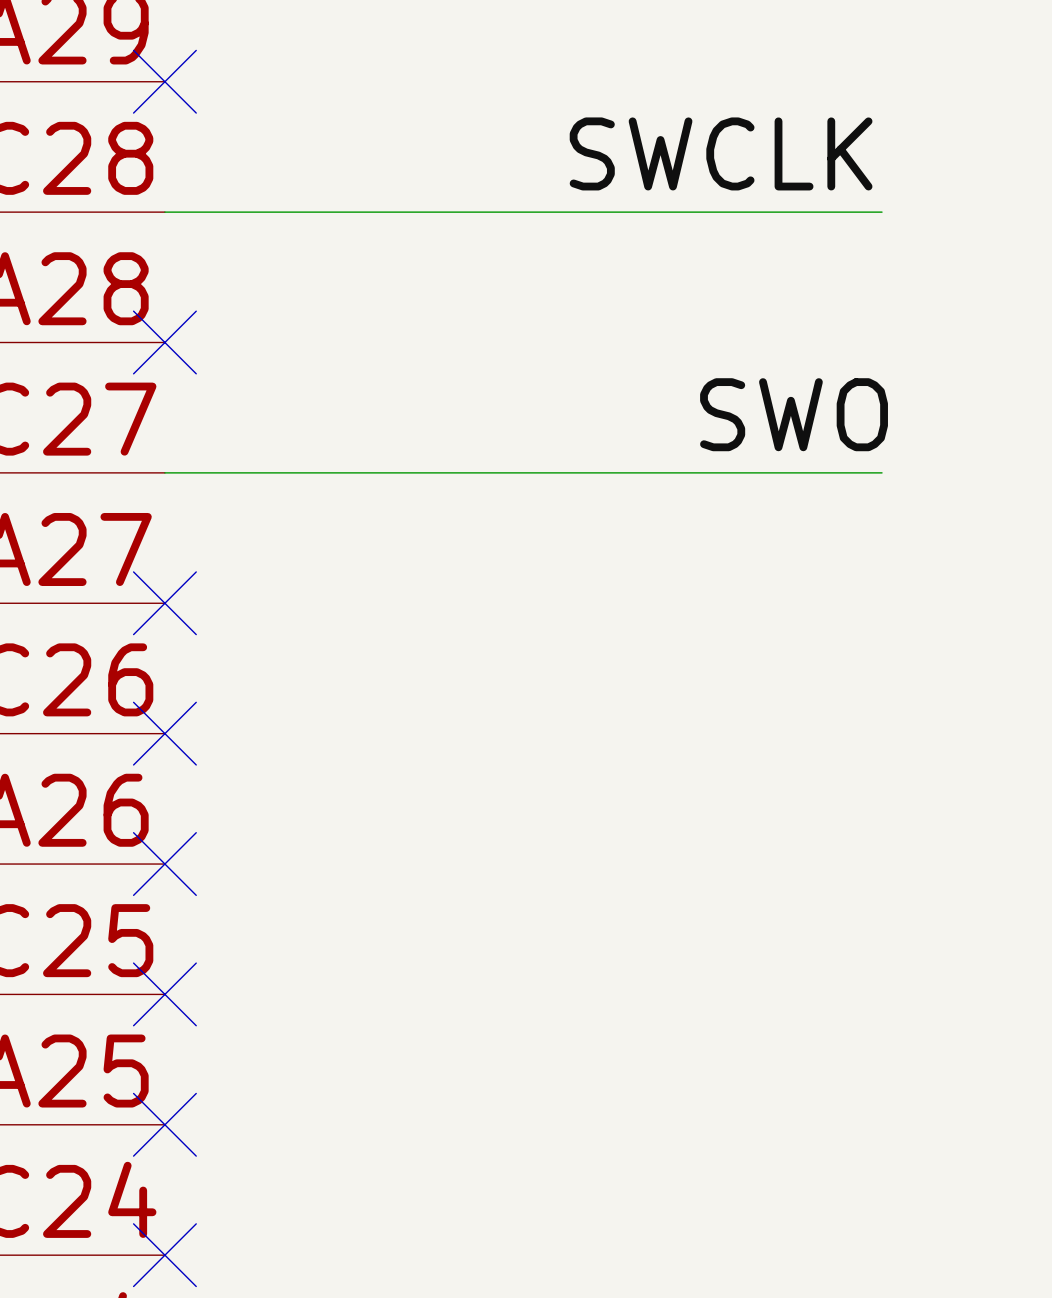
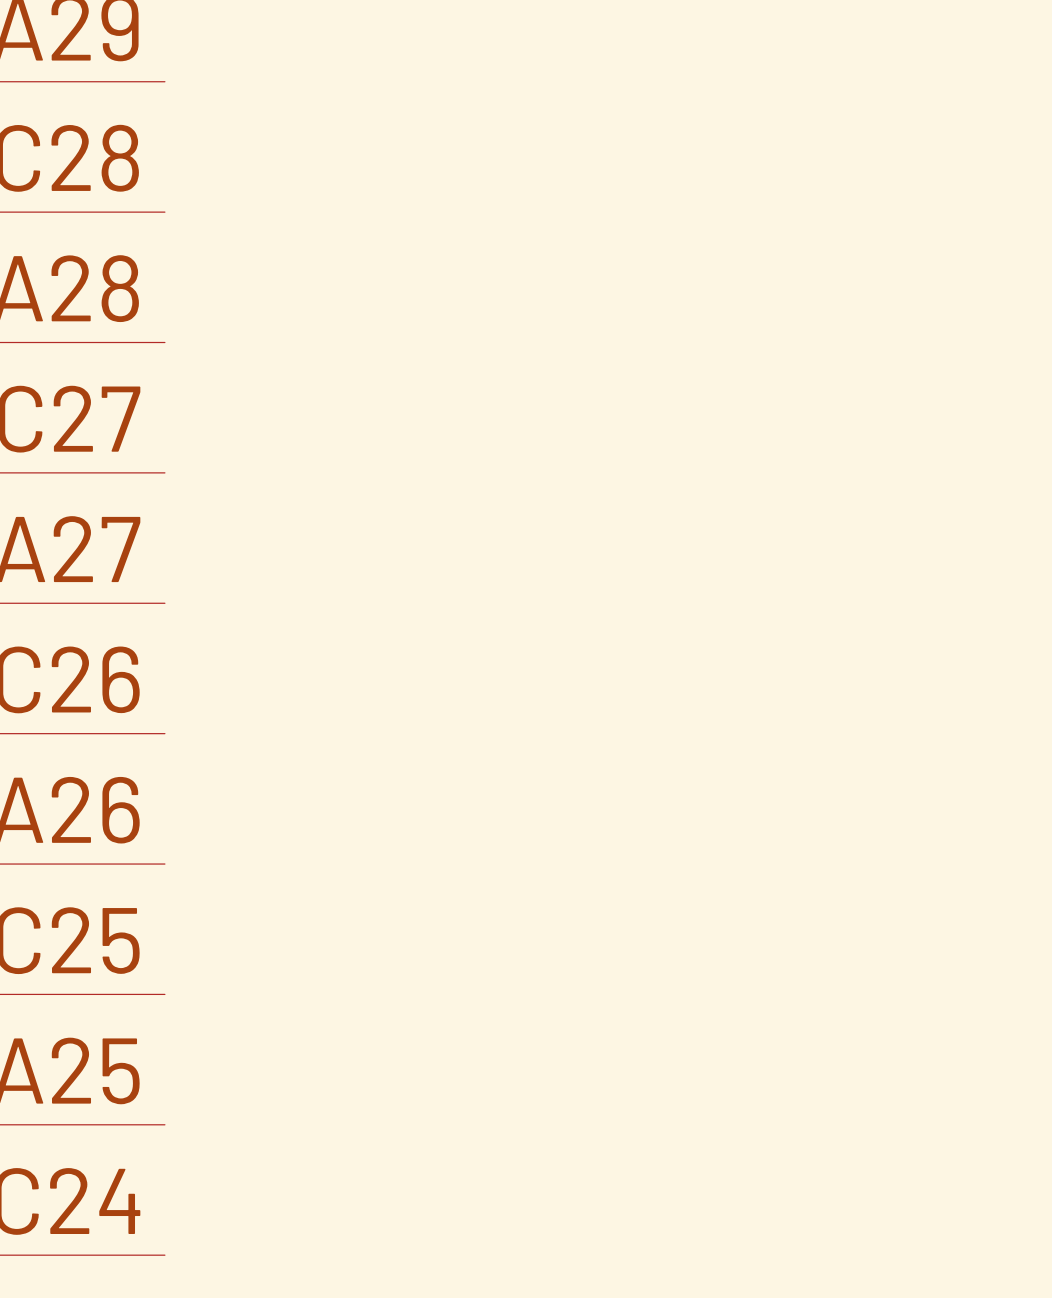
no-connect mark: (164, 81) -> none
label: SWCLK (721, 153) -> none
wire: (164, 212) (882, 212) -> none
no-connect mark: (164, 342) -> none
label: SWO (794, 414) -> none
wire: (164, 472) (882, 472) -> none
no-connect mark: (164, 603) -> none
no-connect mark: (164, 733) -> none
no-connect mark: (164, 864) -> none
no-connect mark: (164, 994) -> none
no-connect mark: (164, 1124) -> none
no-connect mark: (164, 1255) -> none

